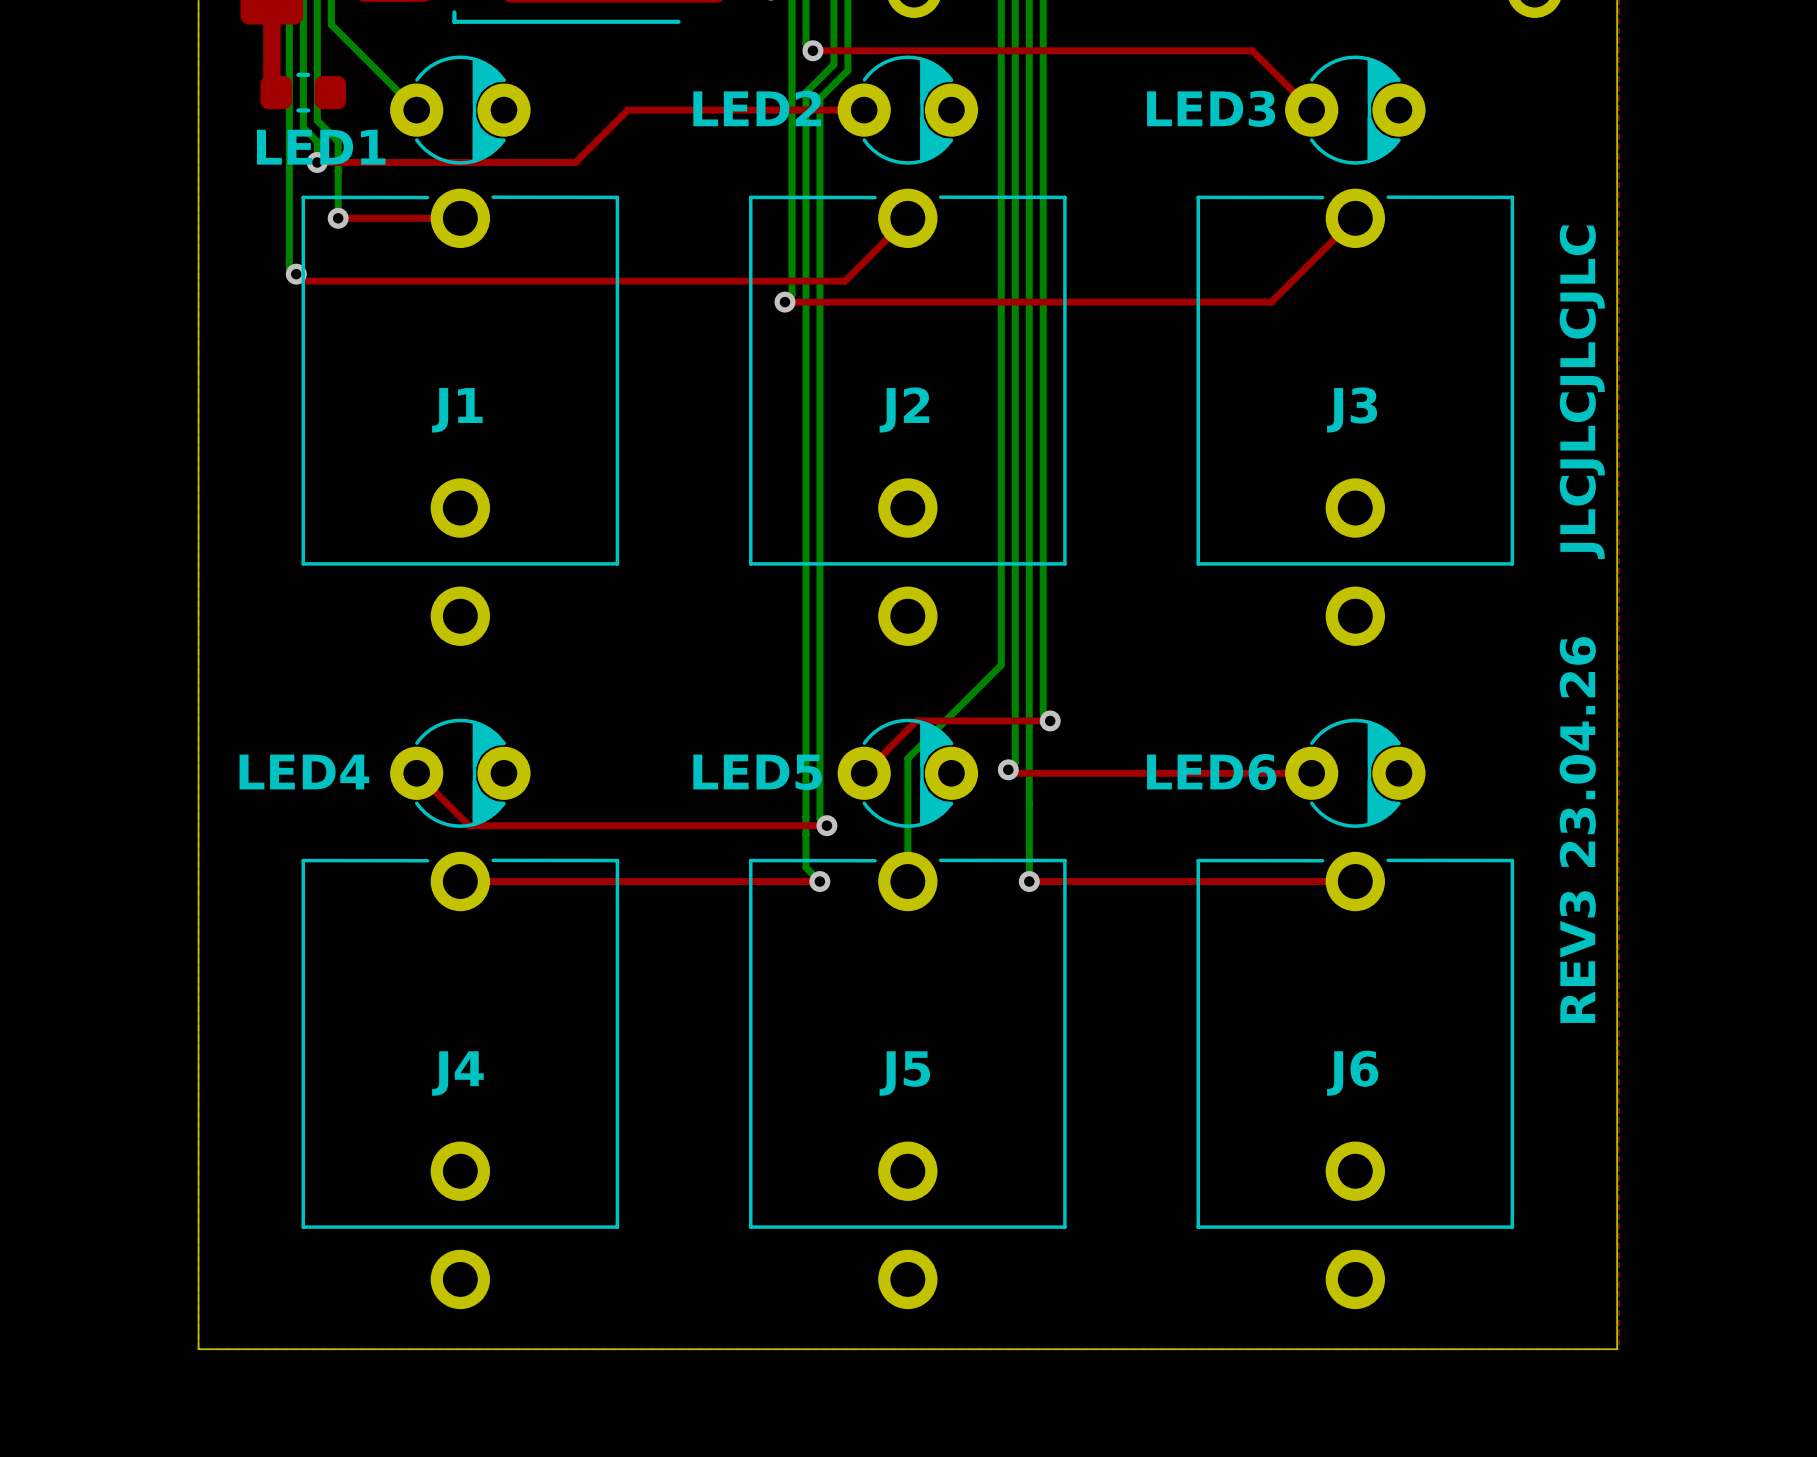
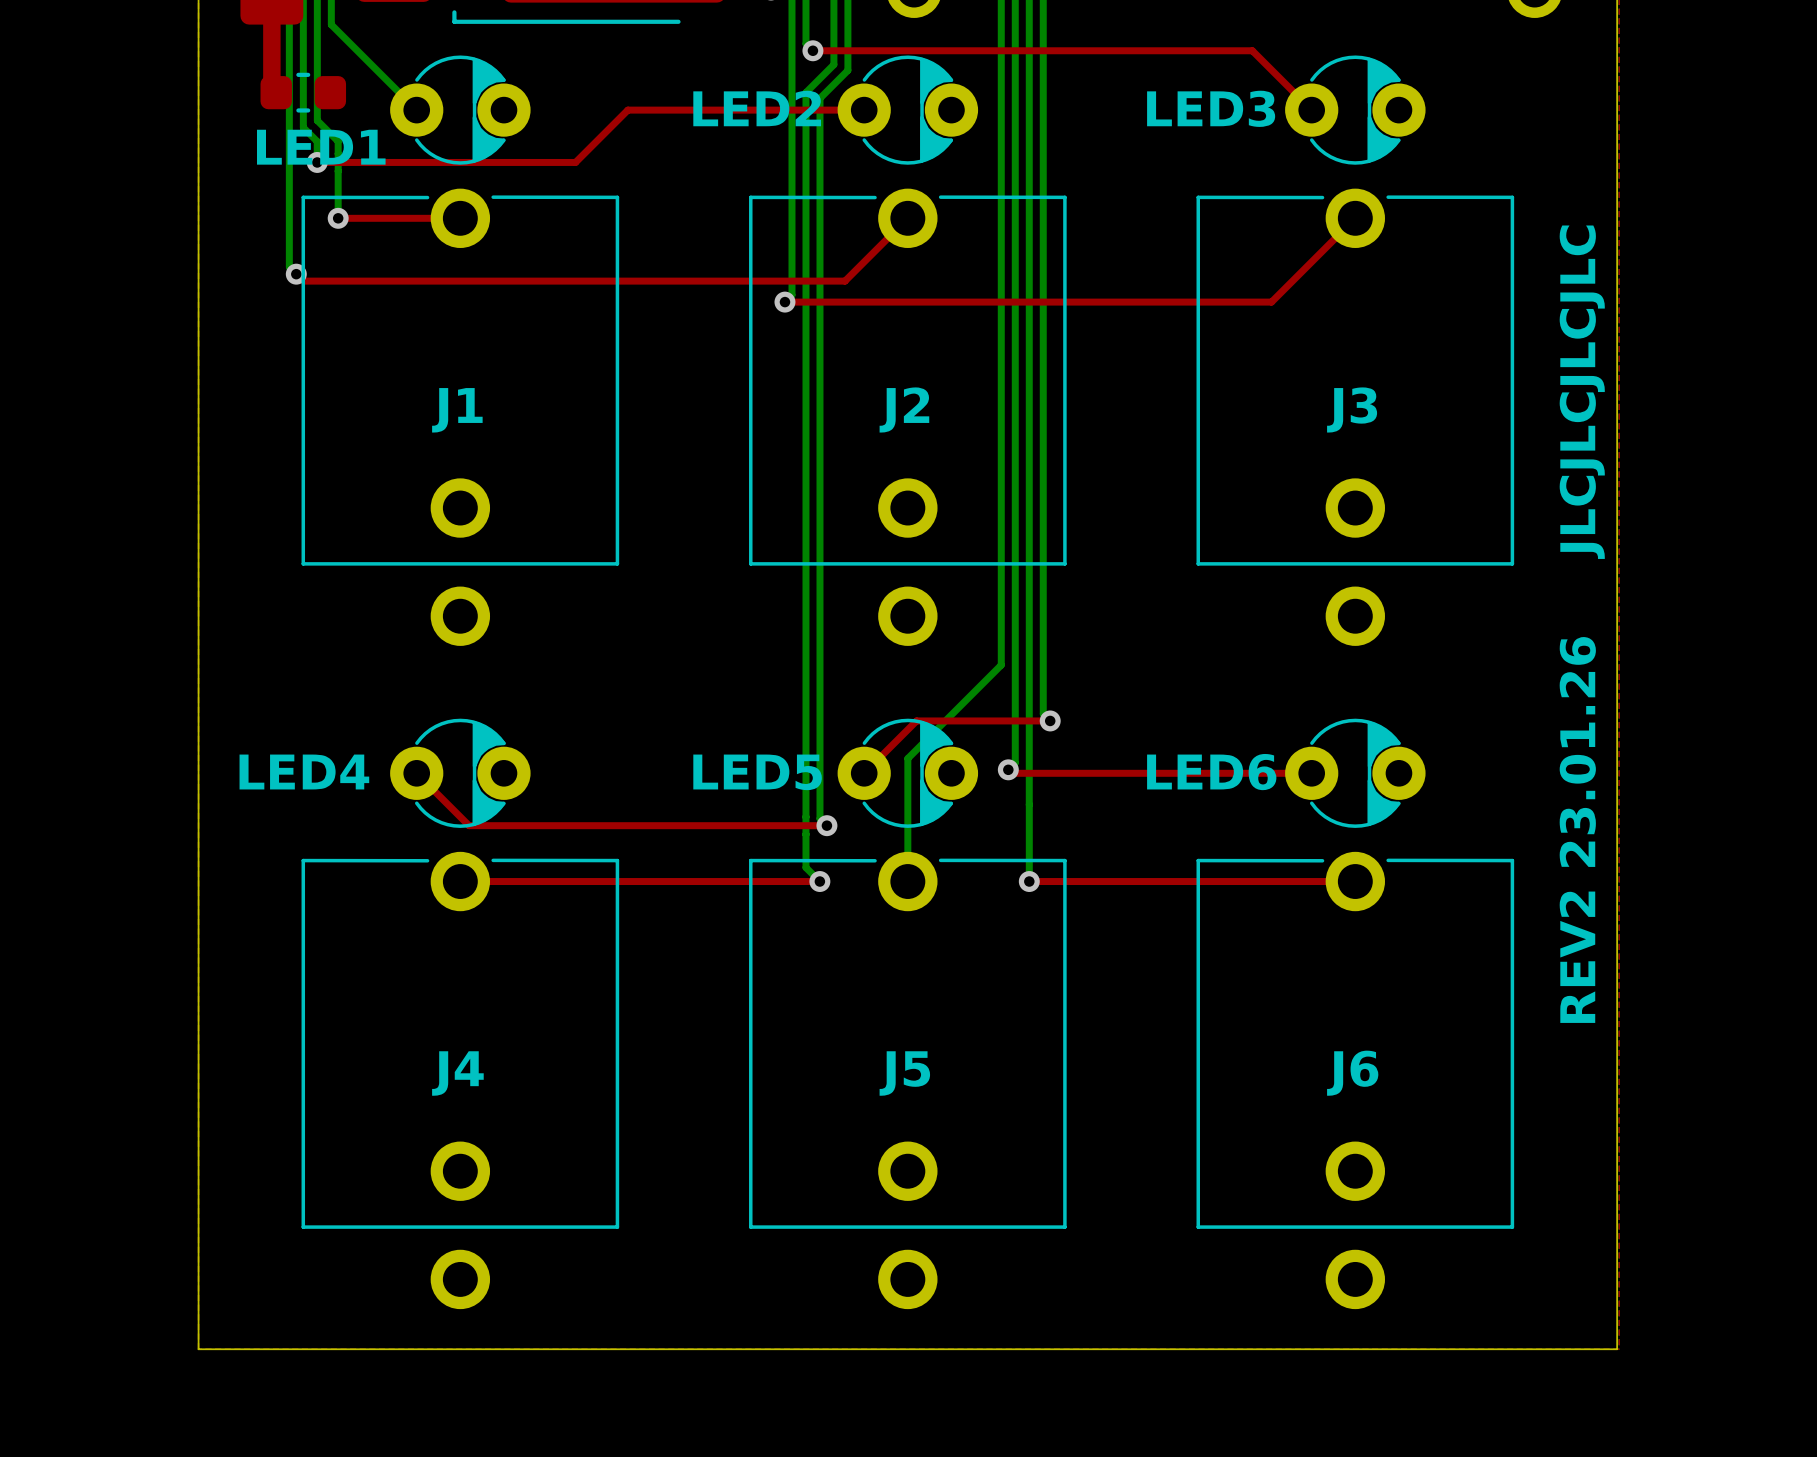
text: REV3 23.04.26 (1577, 829) -> REV2 23.01.26 (1577, 829)

